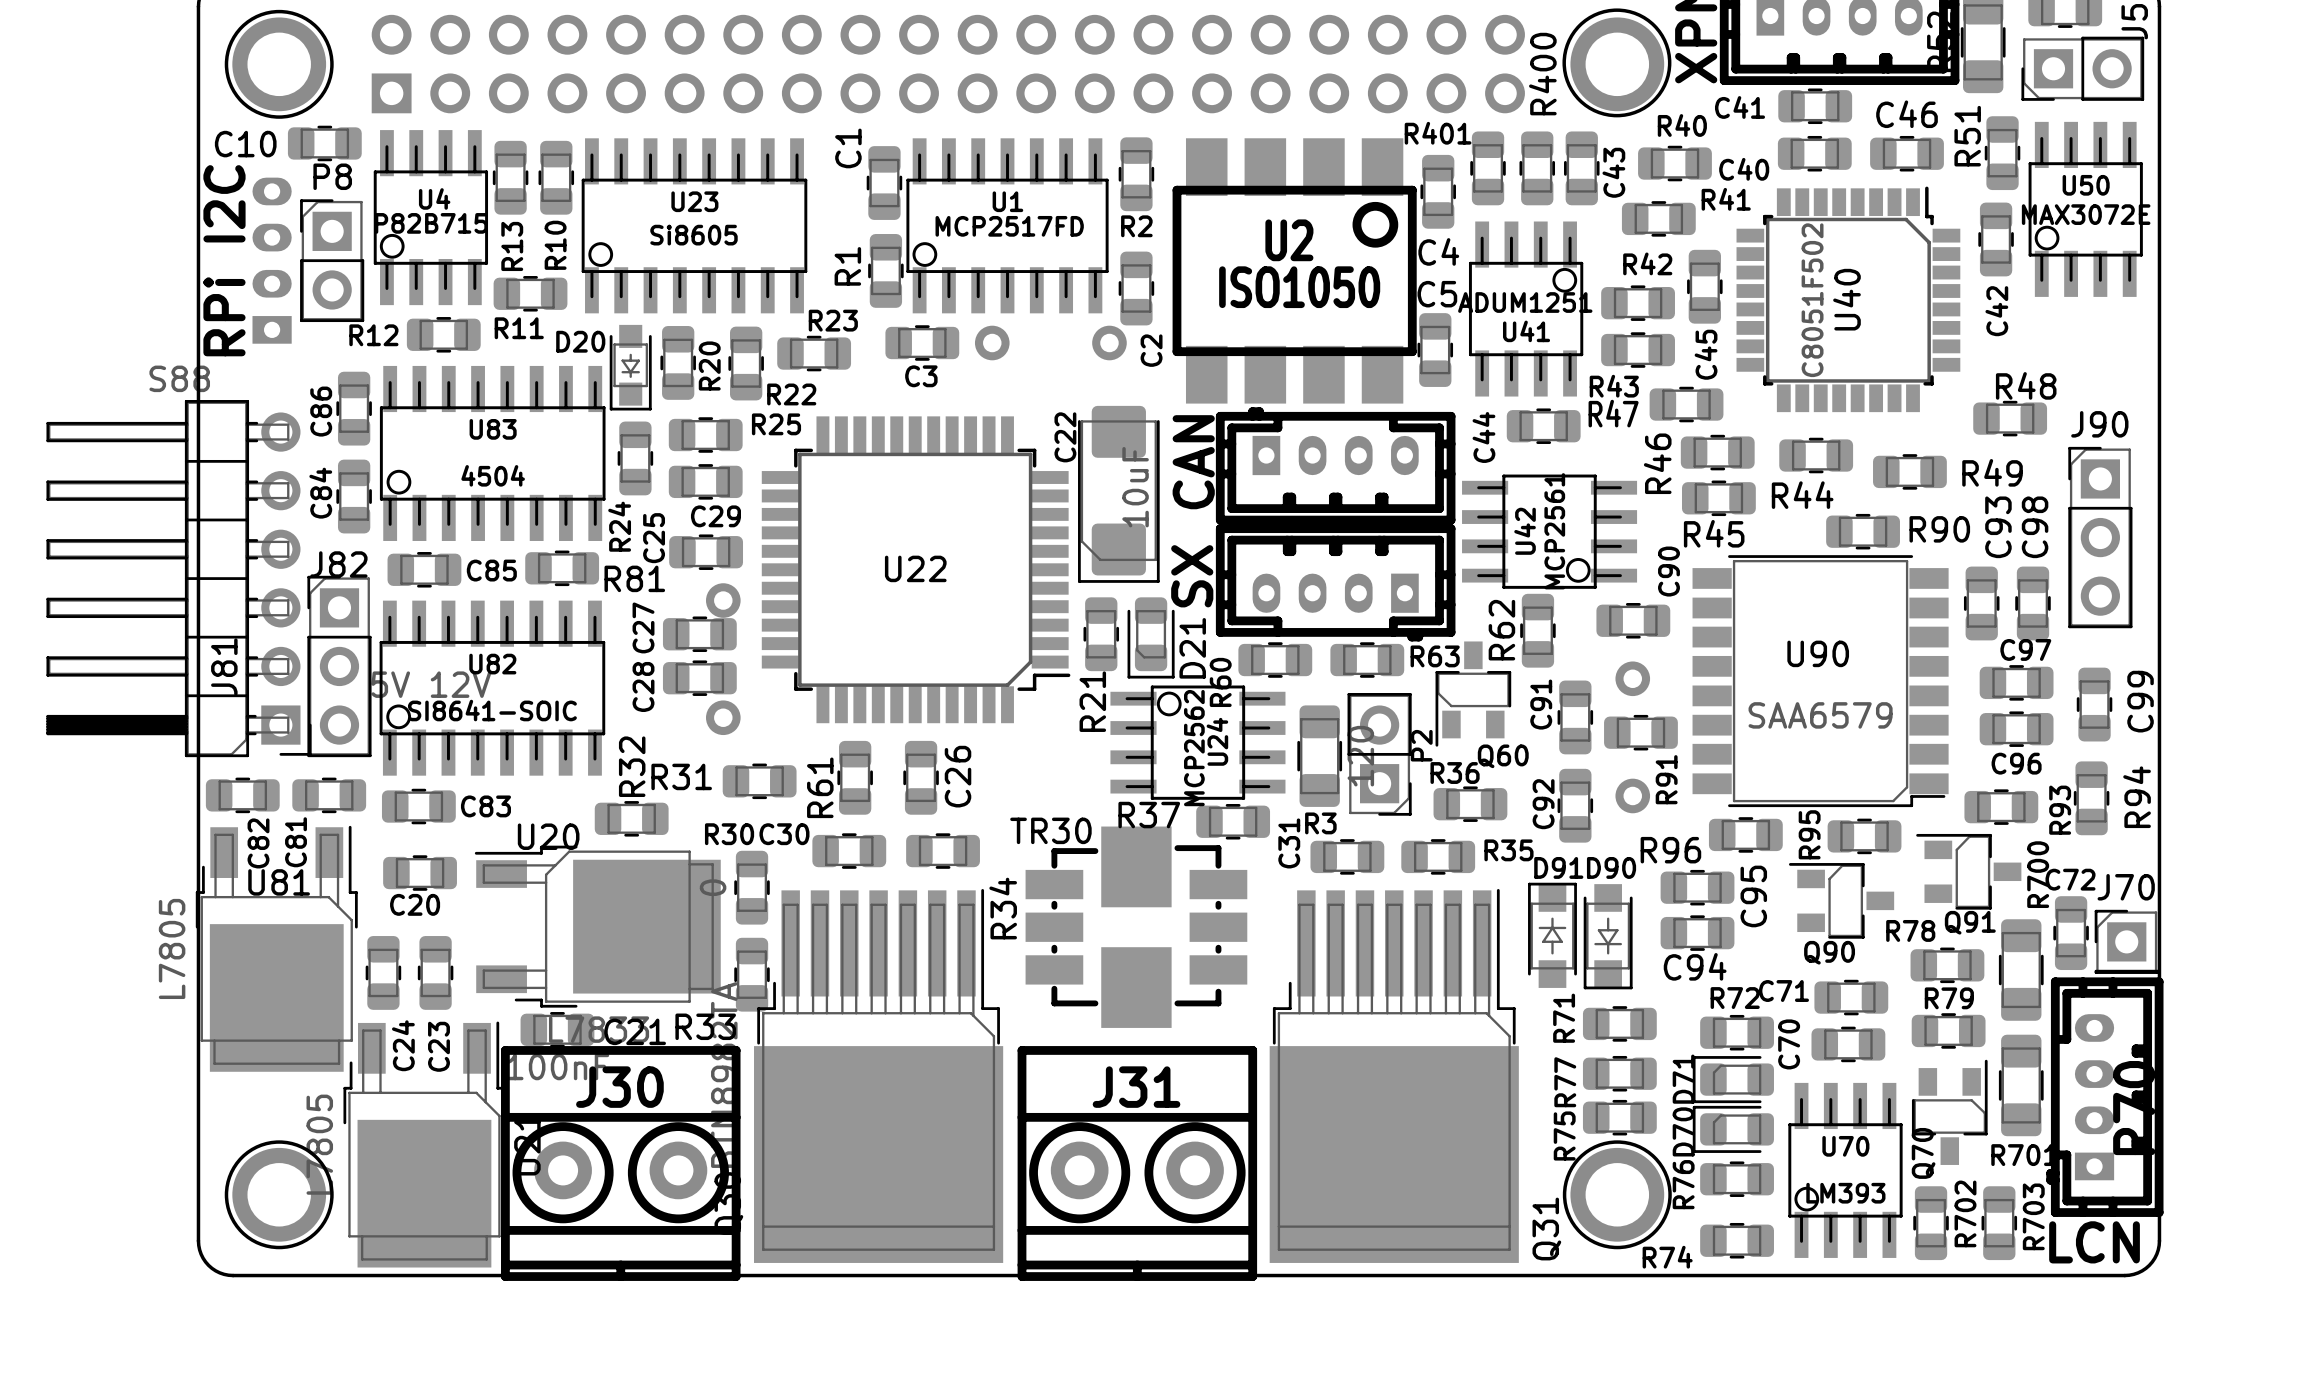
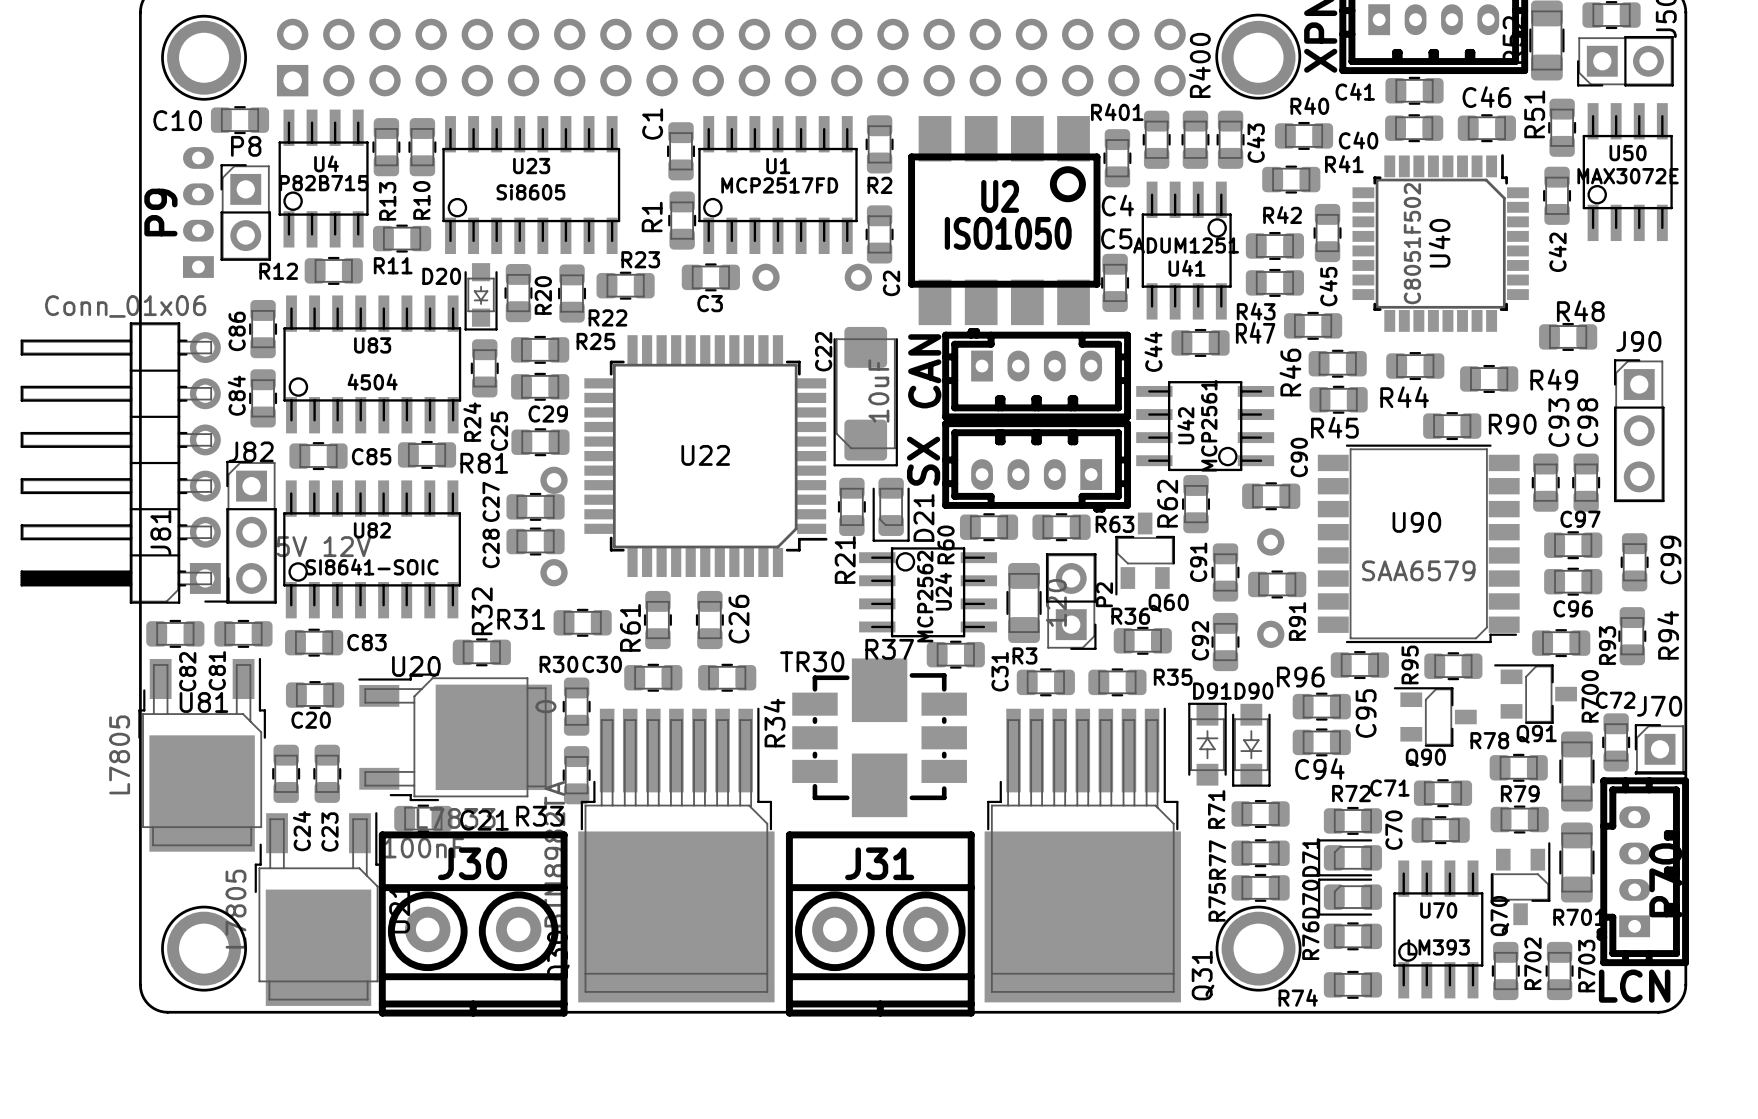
RPi I2C name: RPi I2C (224, 260) -> P9 (160, 212)
J81 value: S88 (179, 378) -> Conn_01x06 (125, 306)

